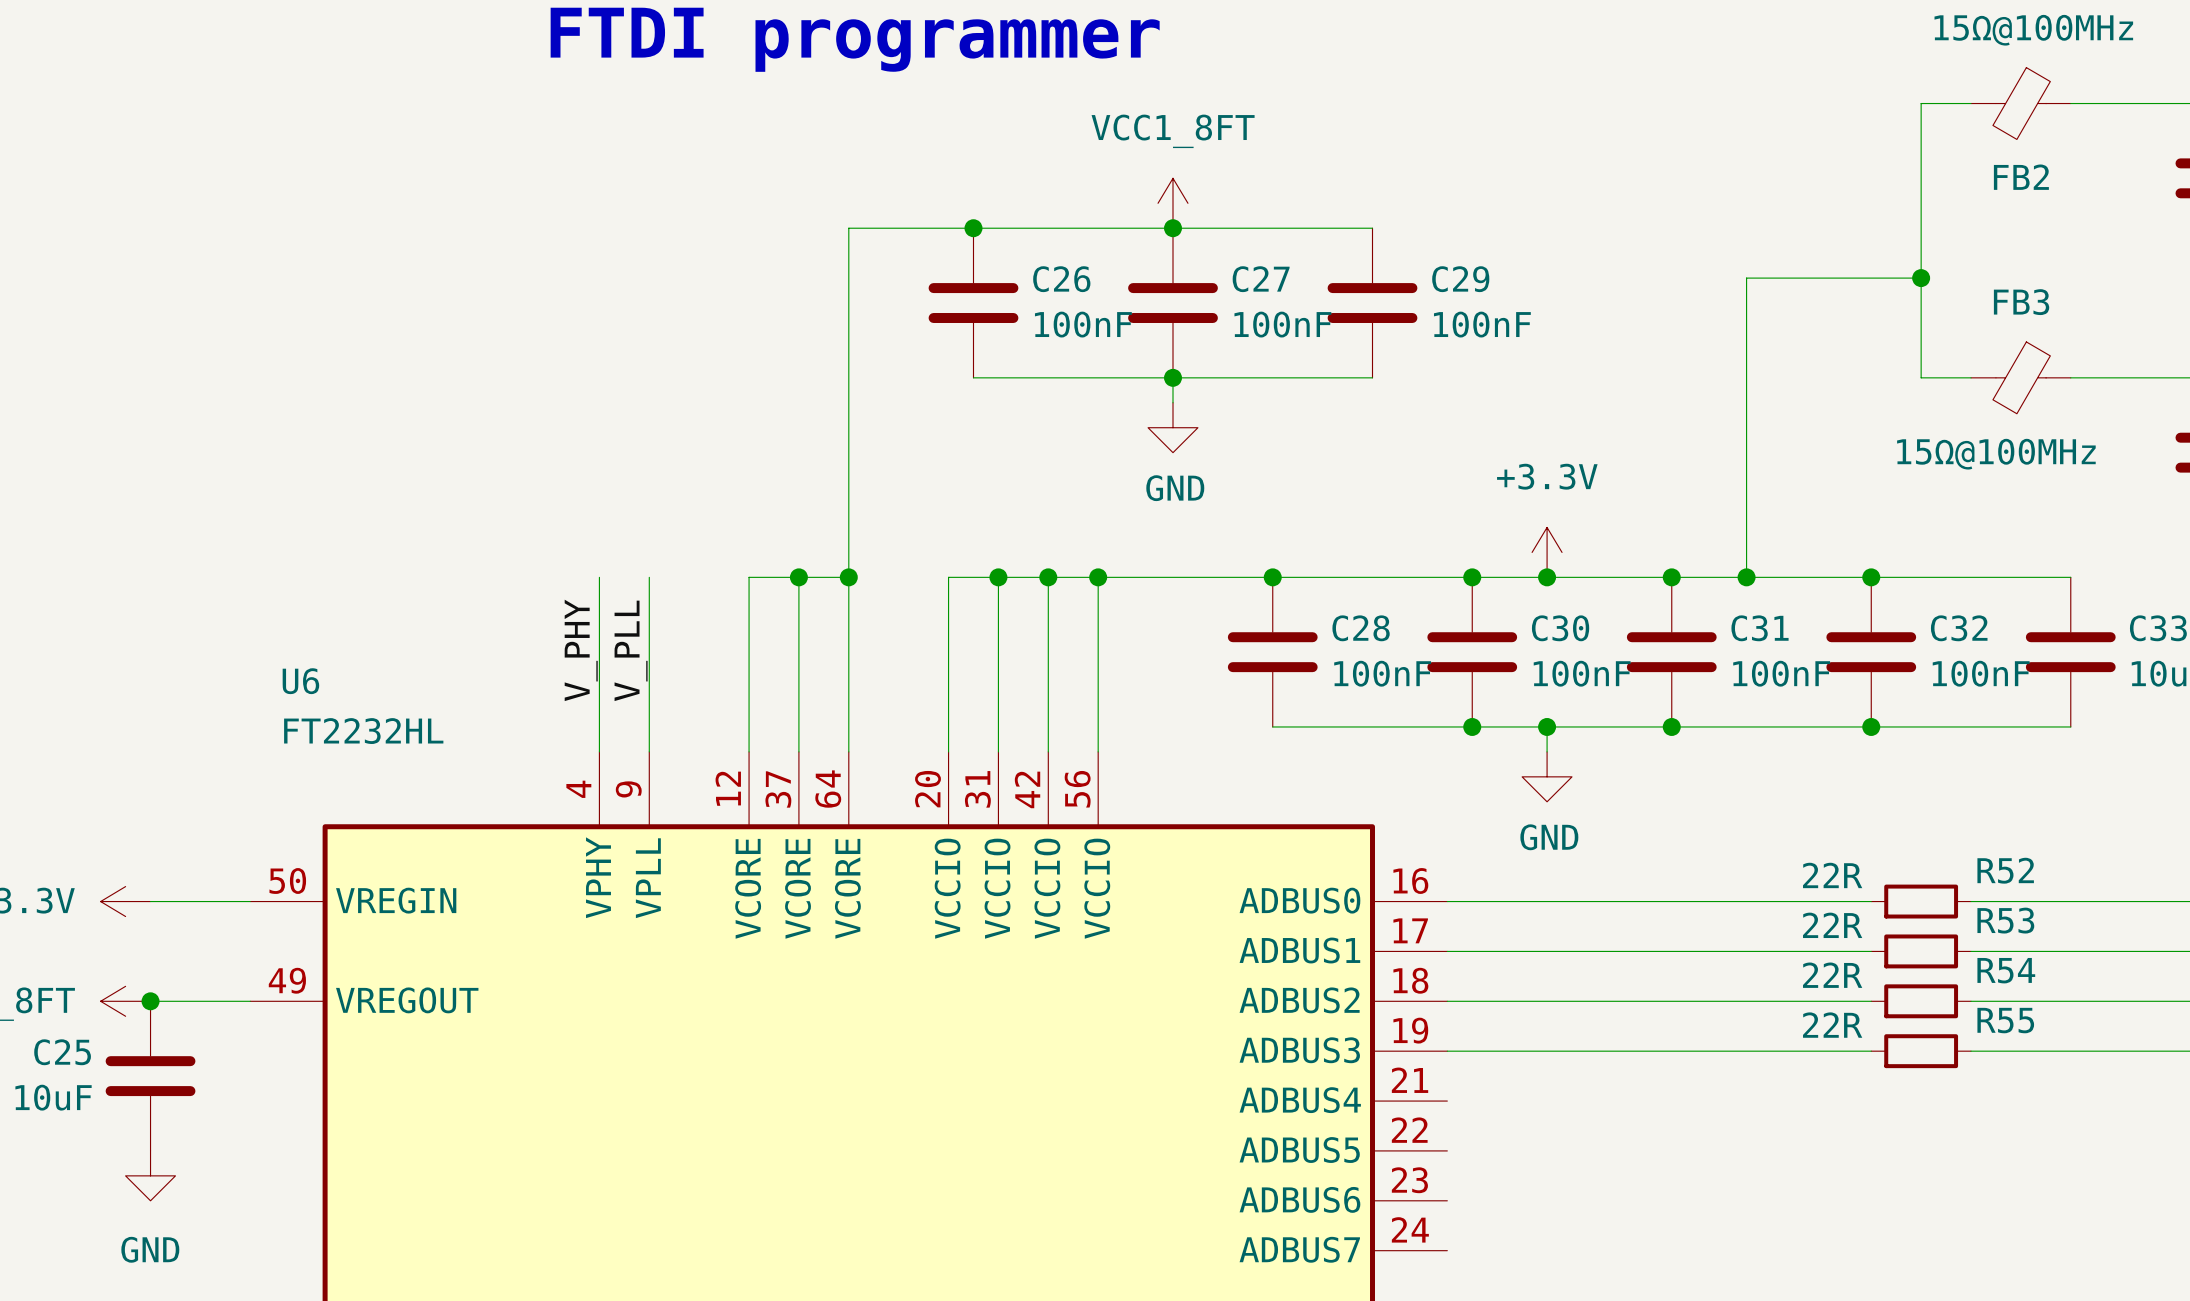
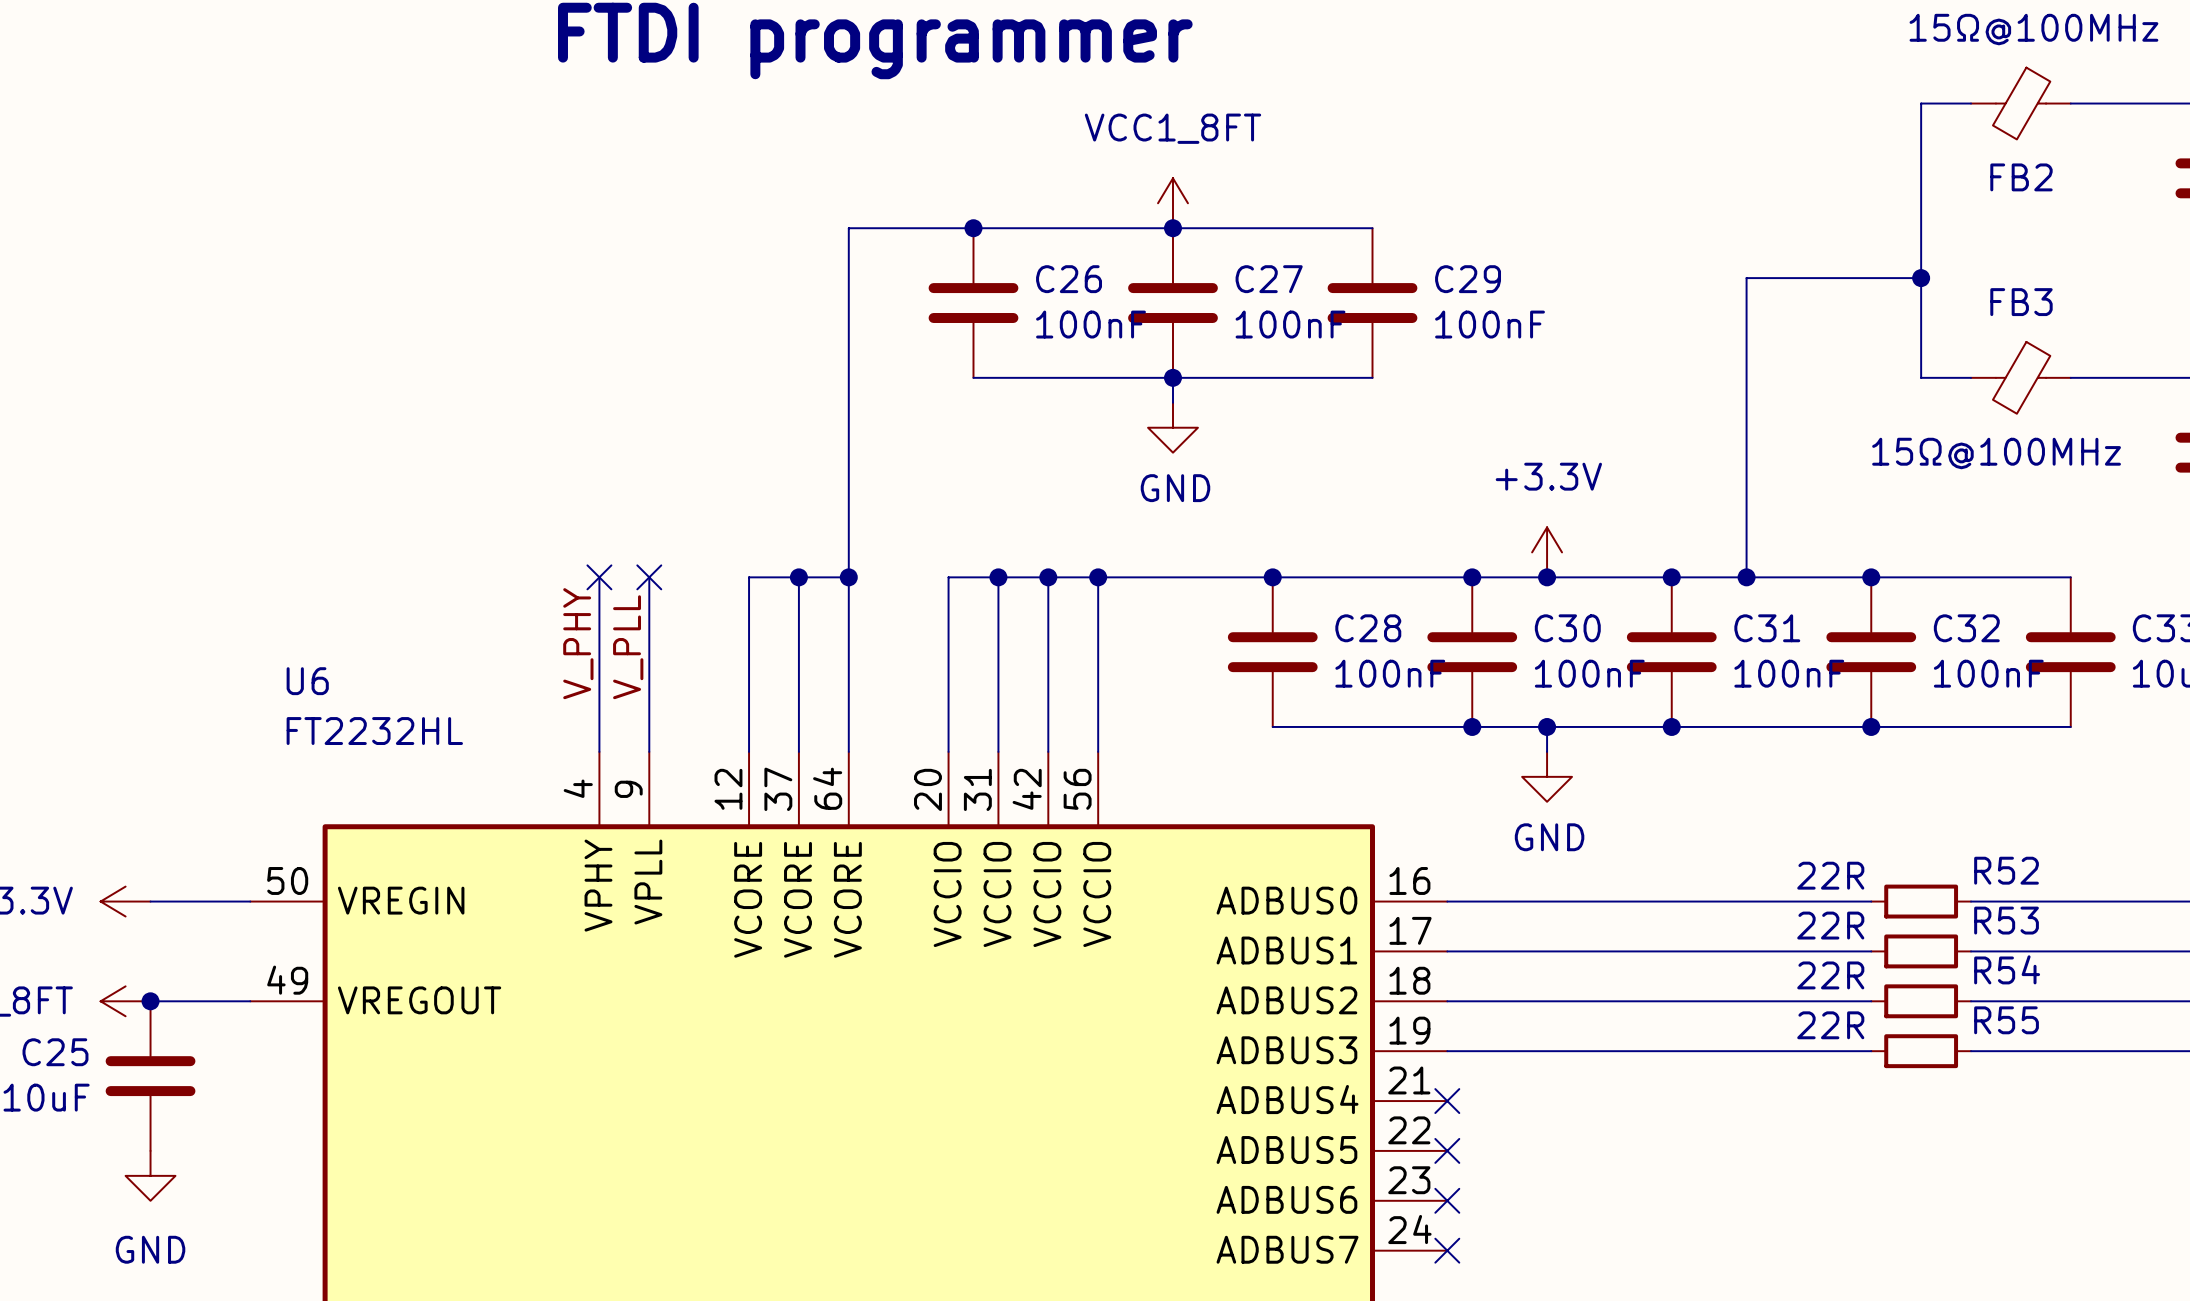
no-connect mark: none -> (599, 577)
no-connect mark: none -> (649, 577)
no-connect mark: none -> (1447, 1101)
no-connect mark: none -> (1447, 1150)
no-connect mark: none -> (1447, 1200)
no-connect mark: none -> (1447, 1250)

